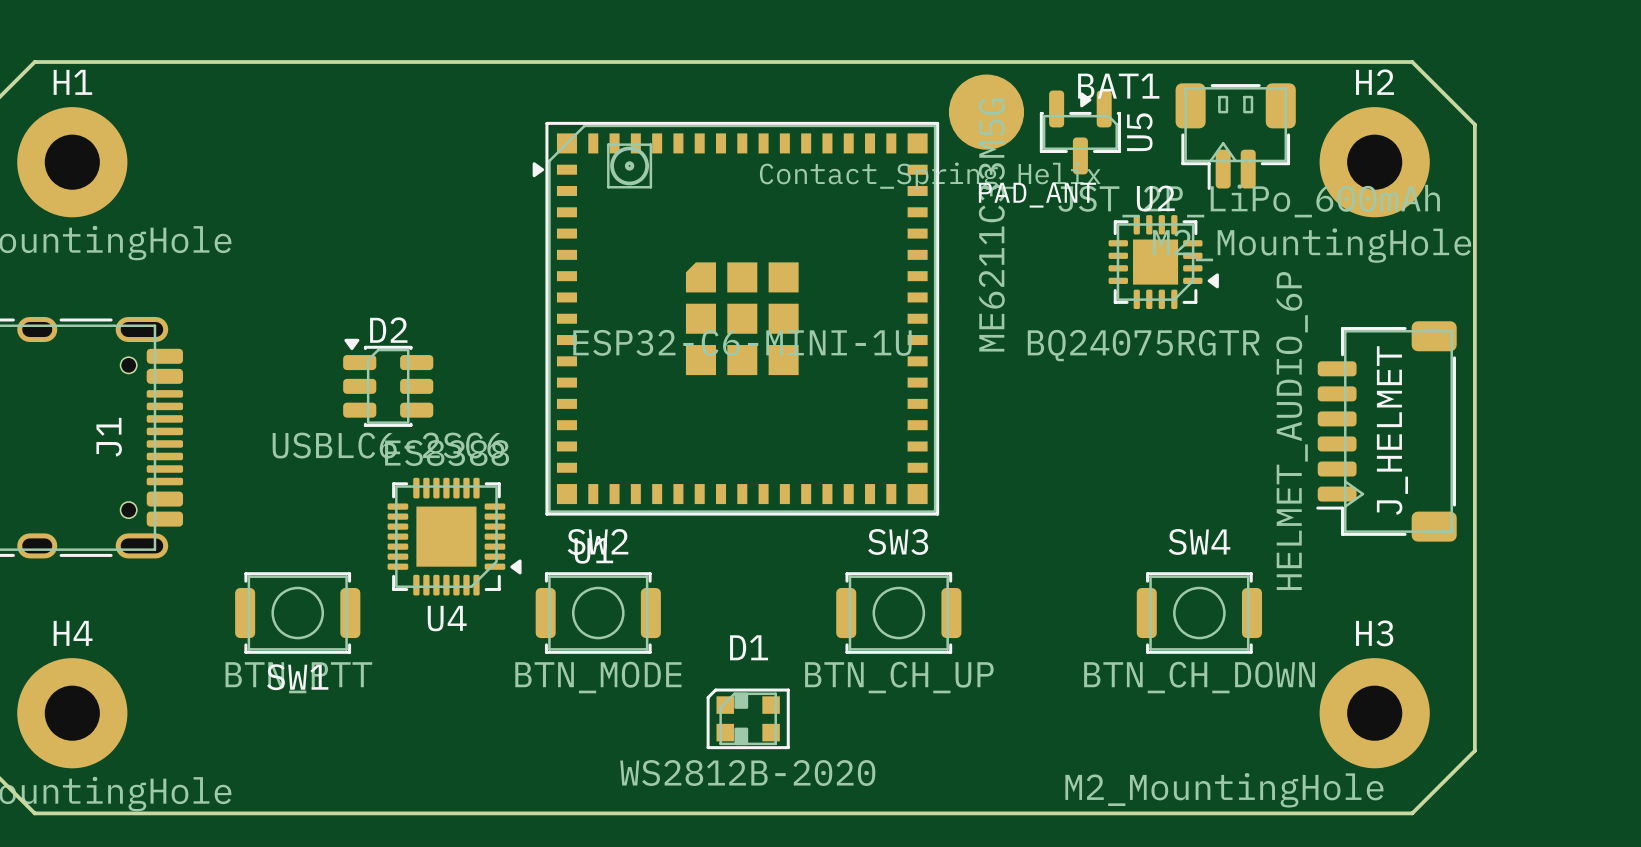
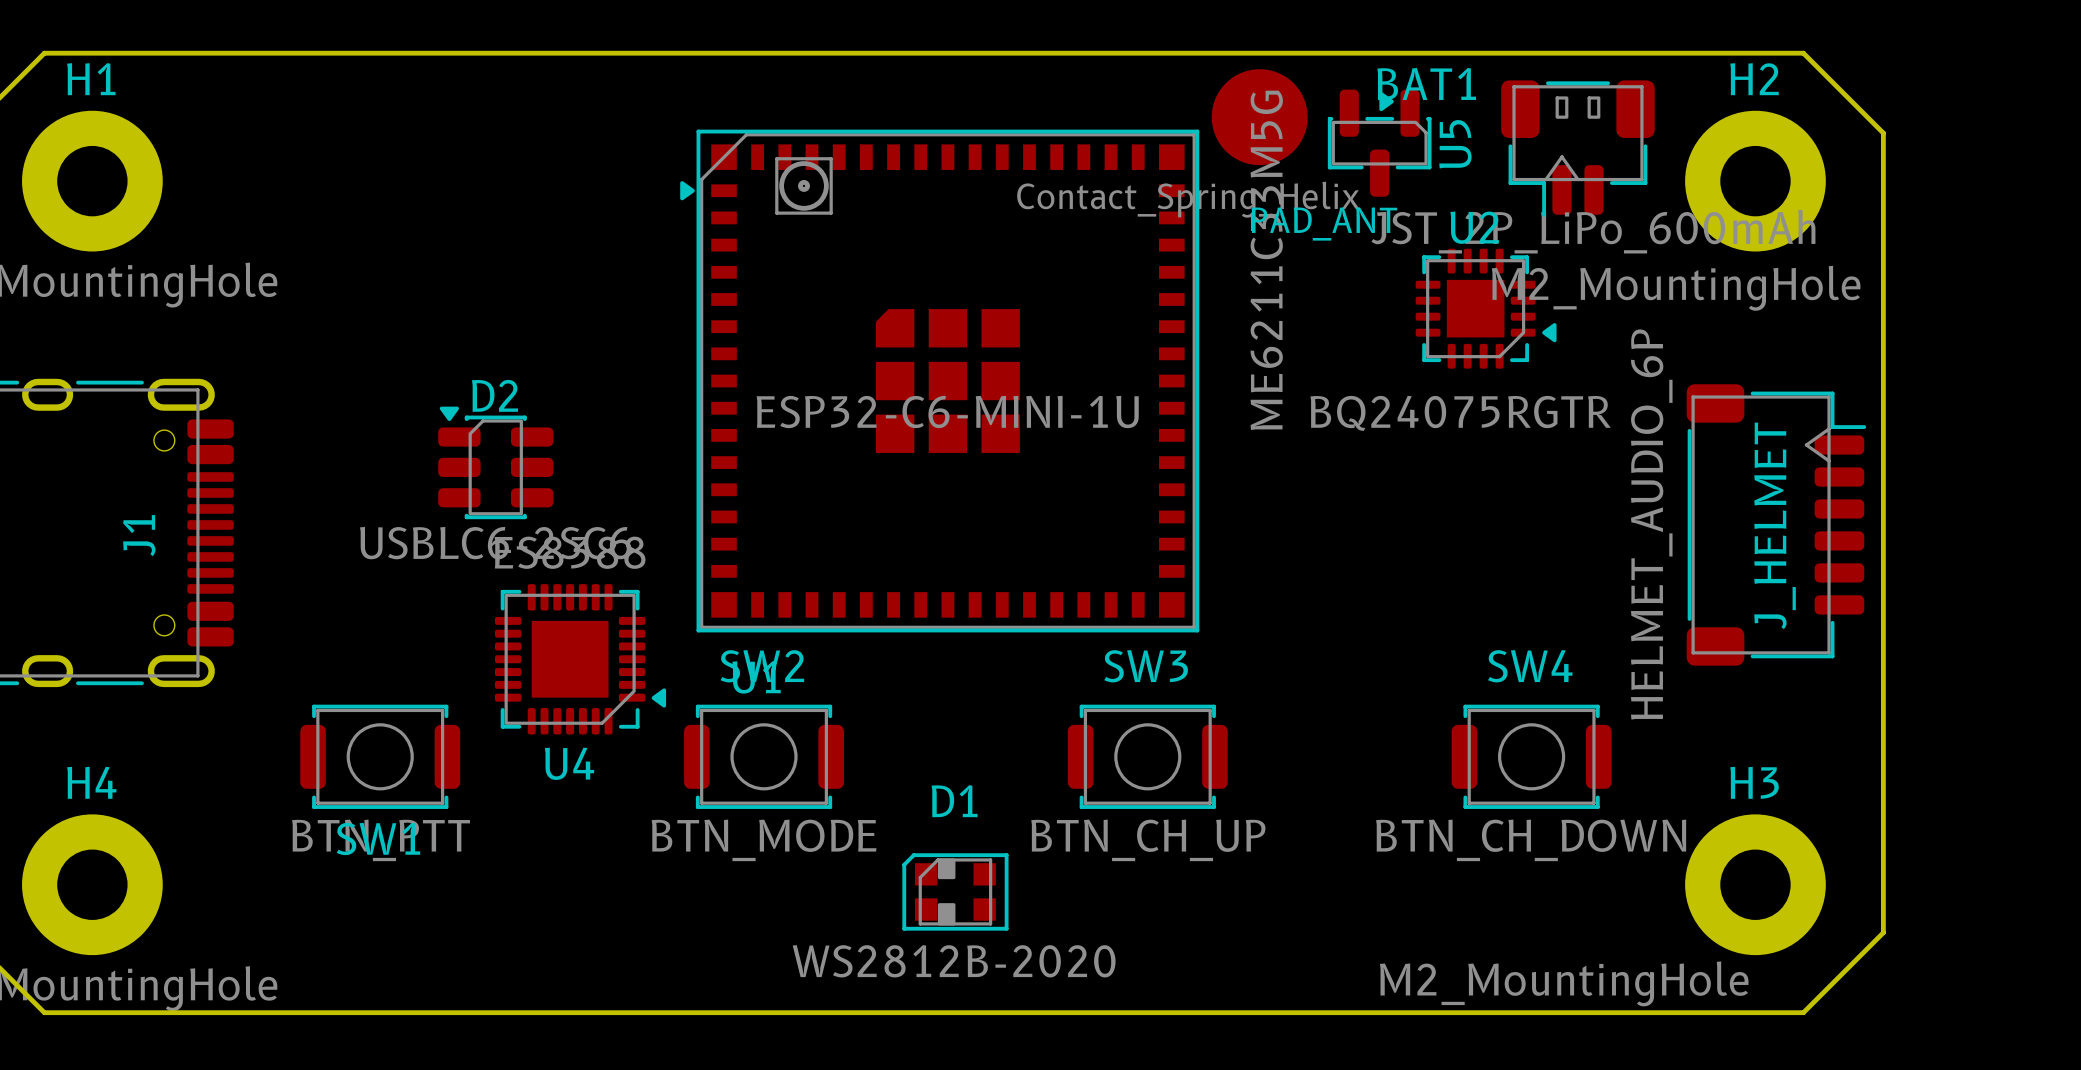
J_HELMET rotation: 0° (1386, 431) -> 180° (1776, 524)

